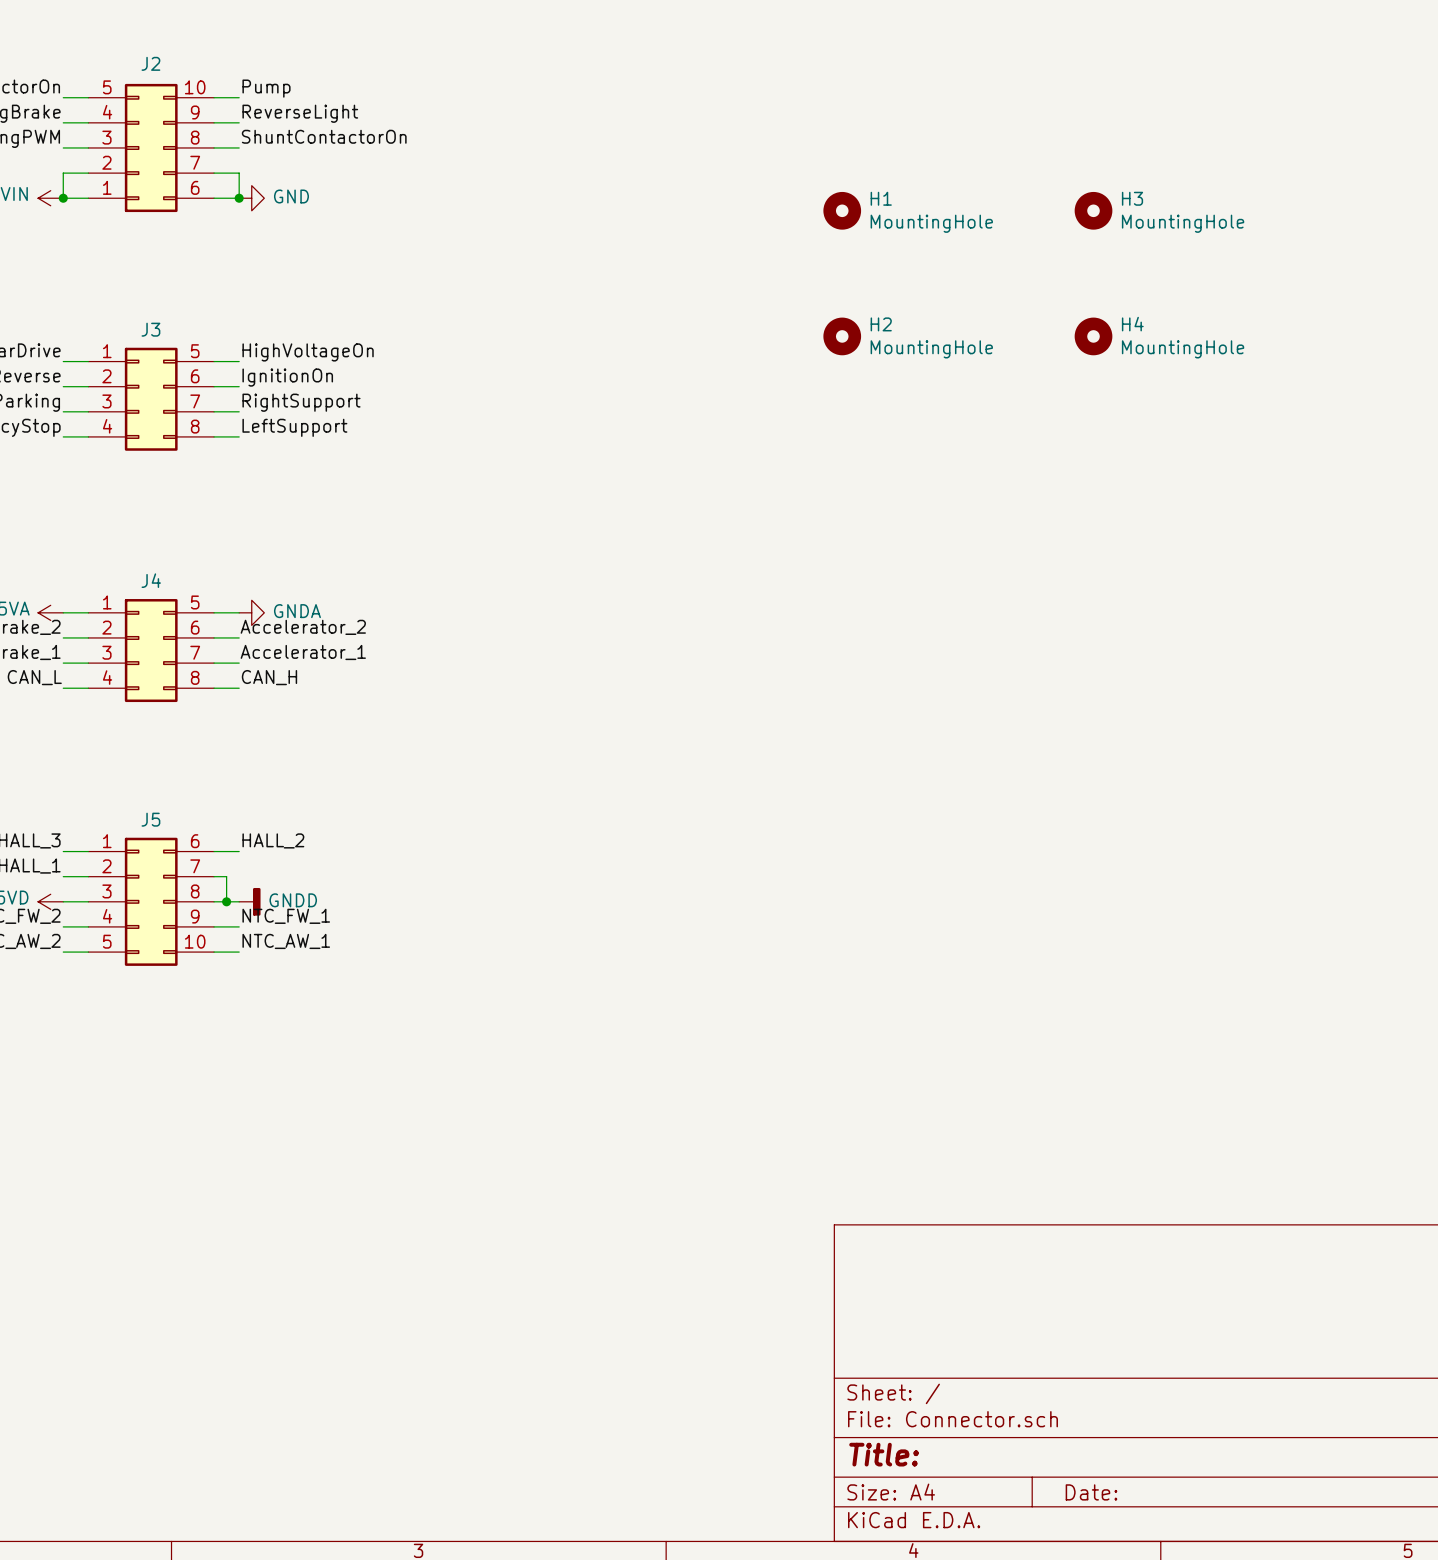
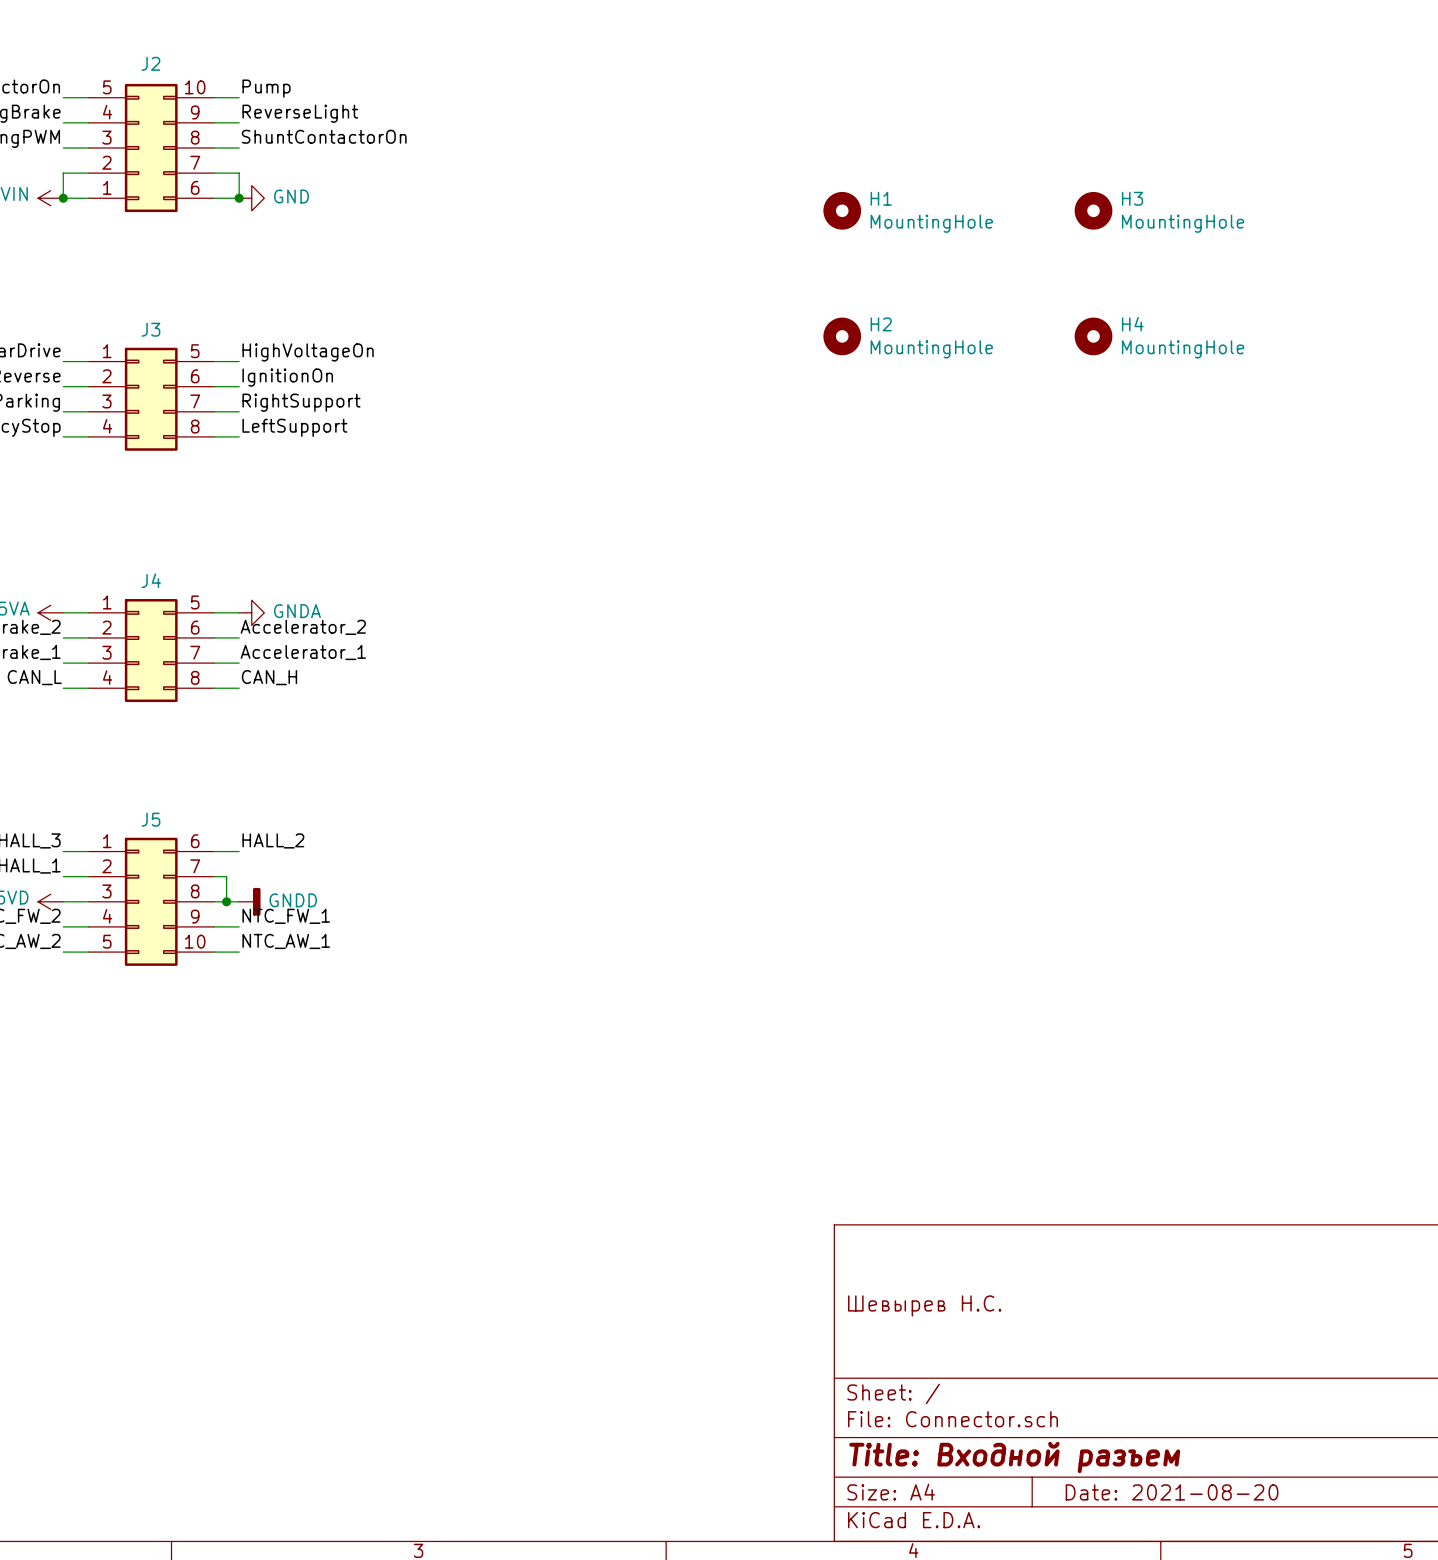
title block: none -> Шевырев Н.С. (924, 1305)
title block: Title: (884, 1454) -> Title: Входной разъем (1014, 1457)
title block: Date: (1091, 1492) -> Date: 2021-08-20 (1172, 1492)

